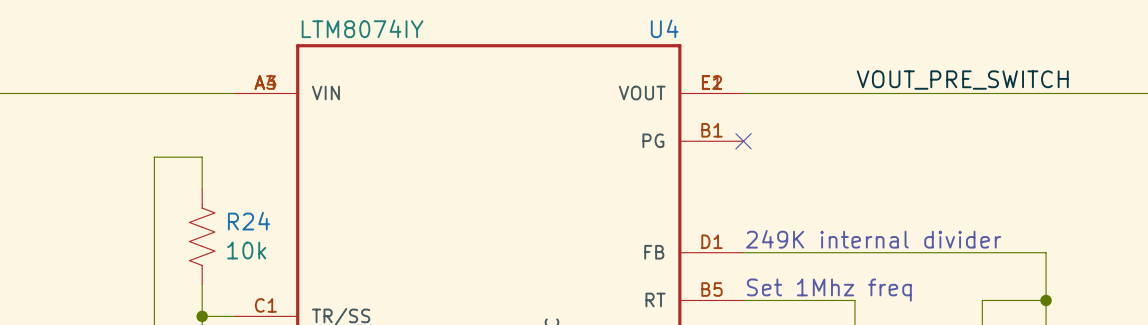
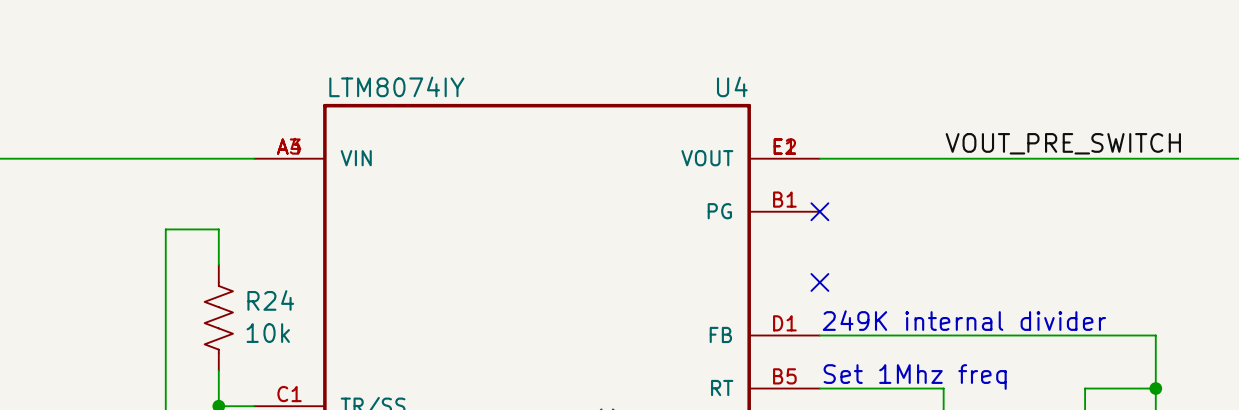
no-connect mark: none -> (819, 282)

